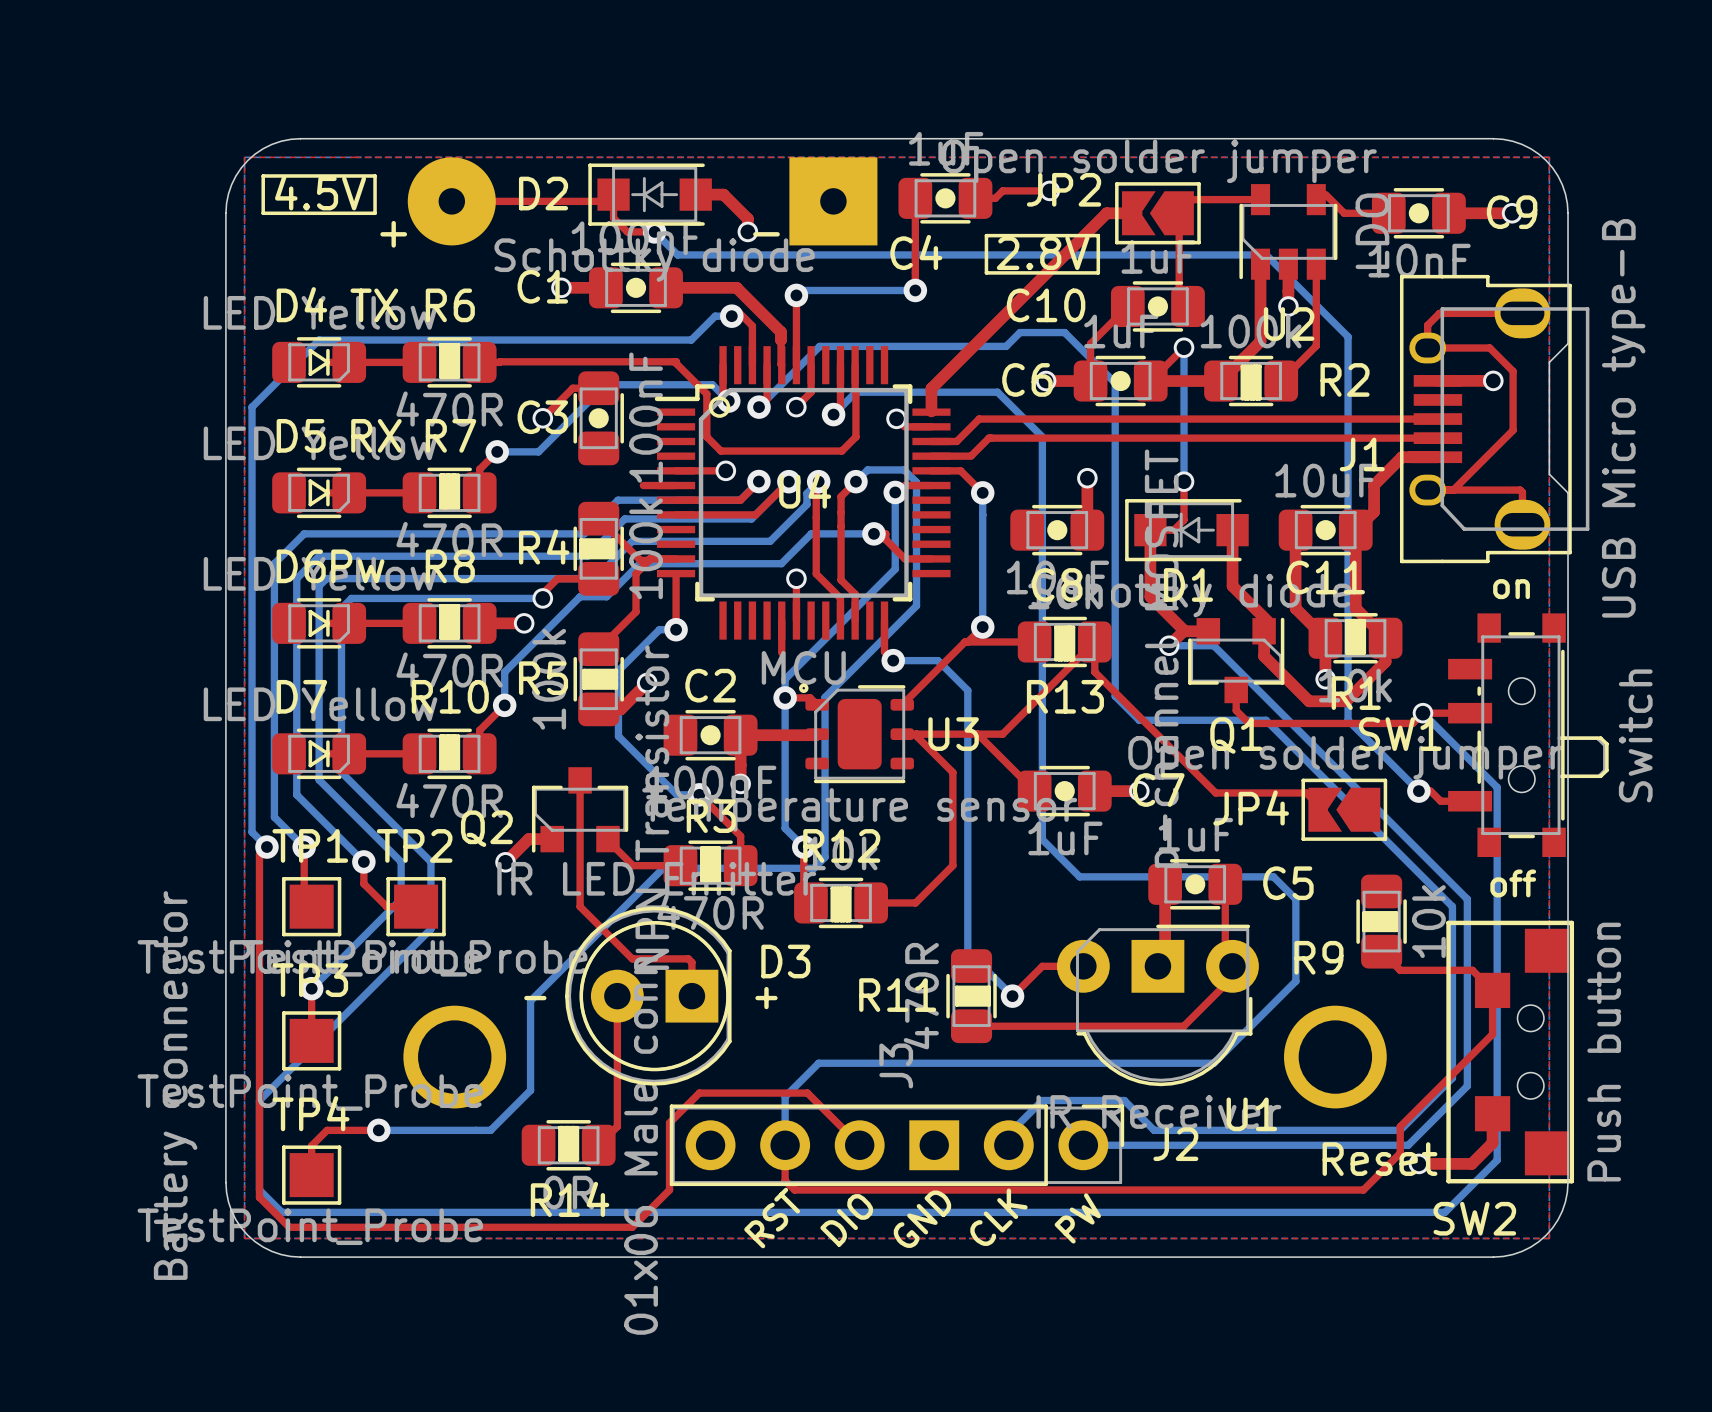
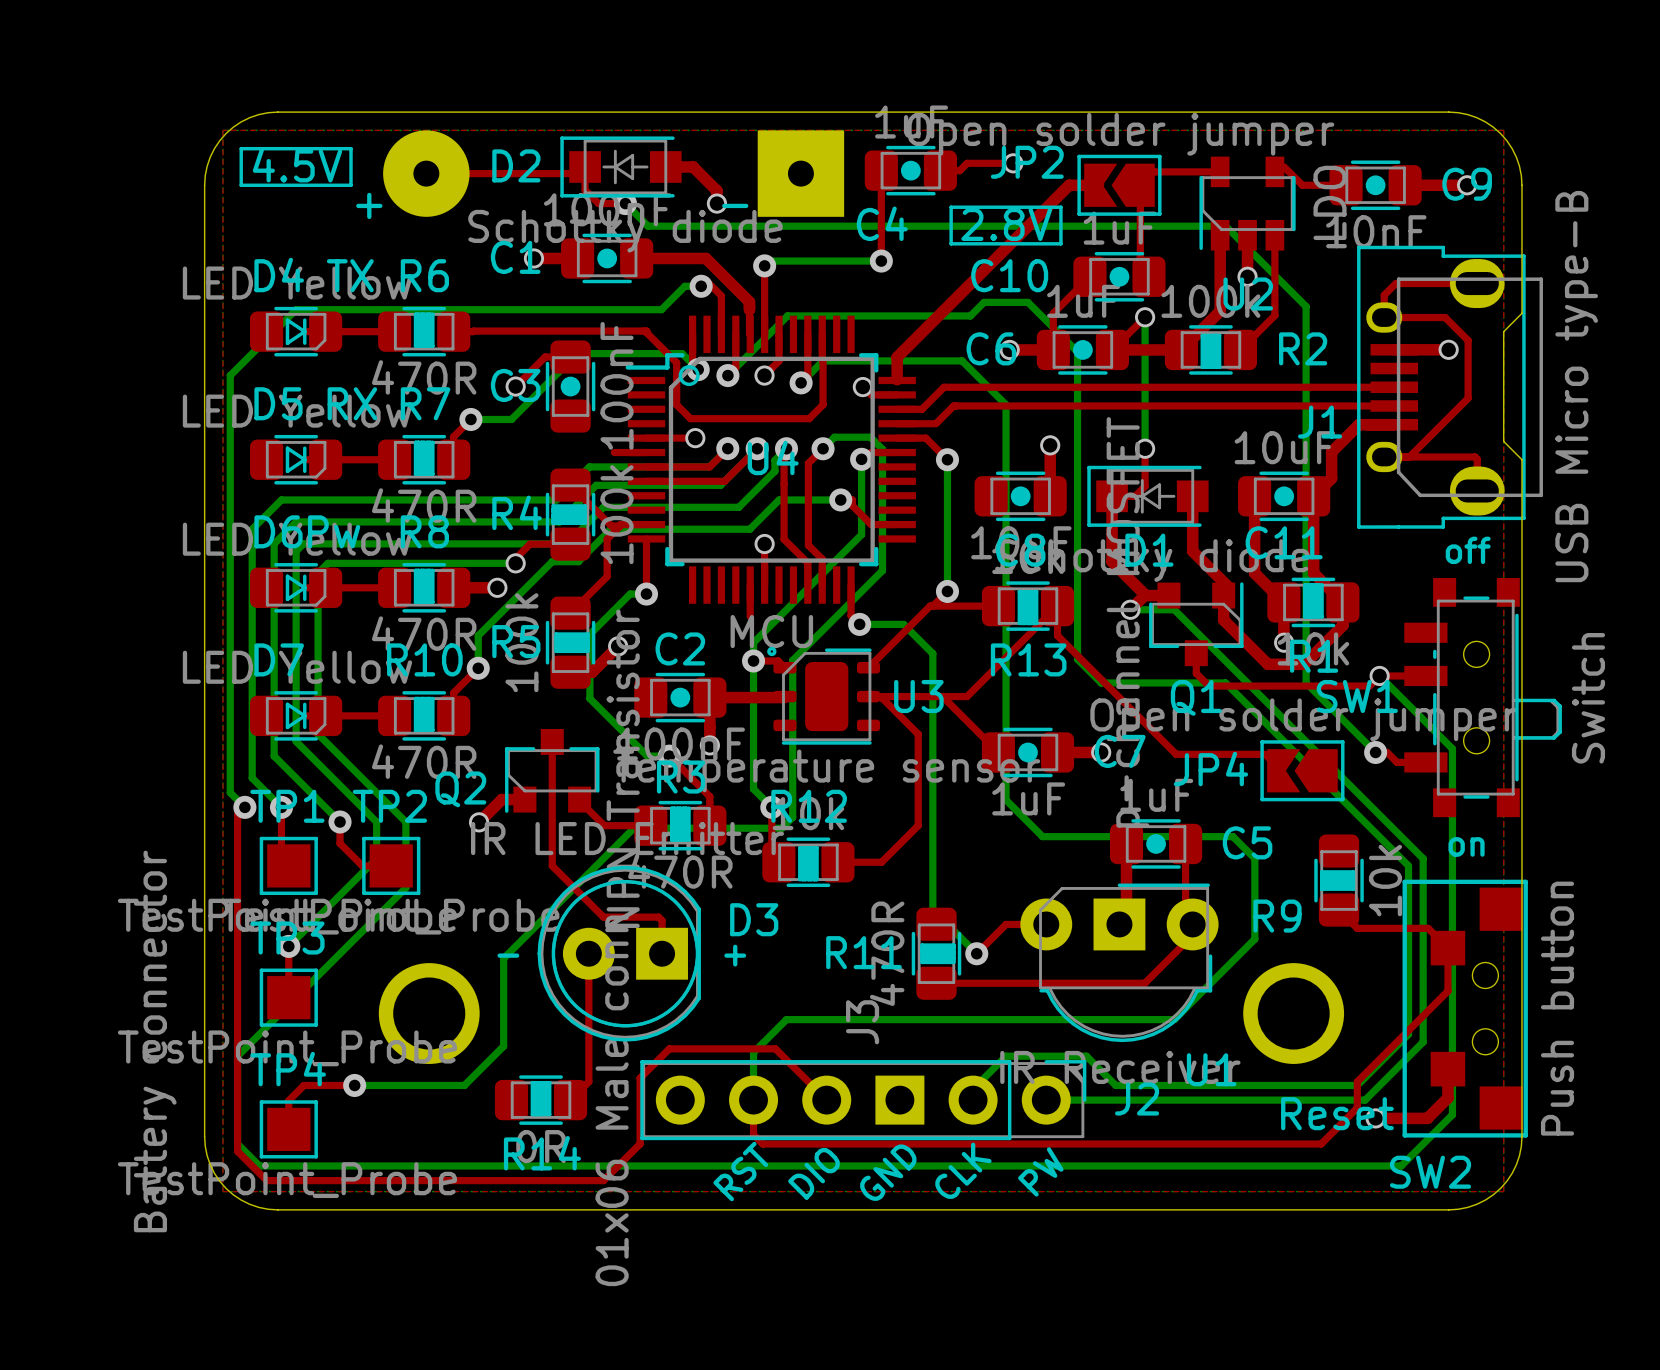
text: on (1511, 589) -> off (1468, 550)
text: off (1513, 883) -> on (1466, 846)

